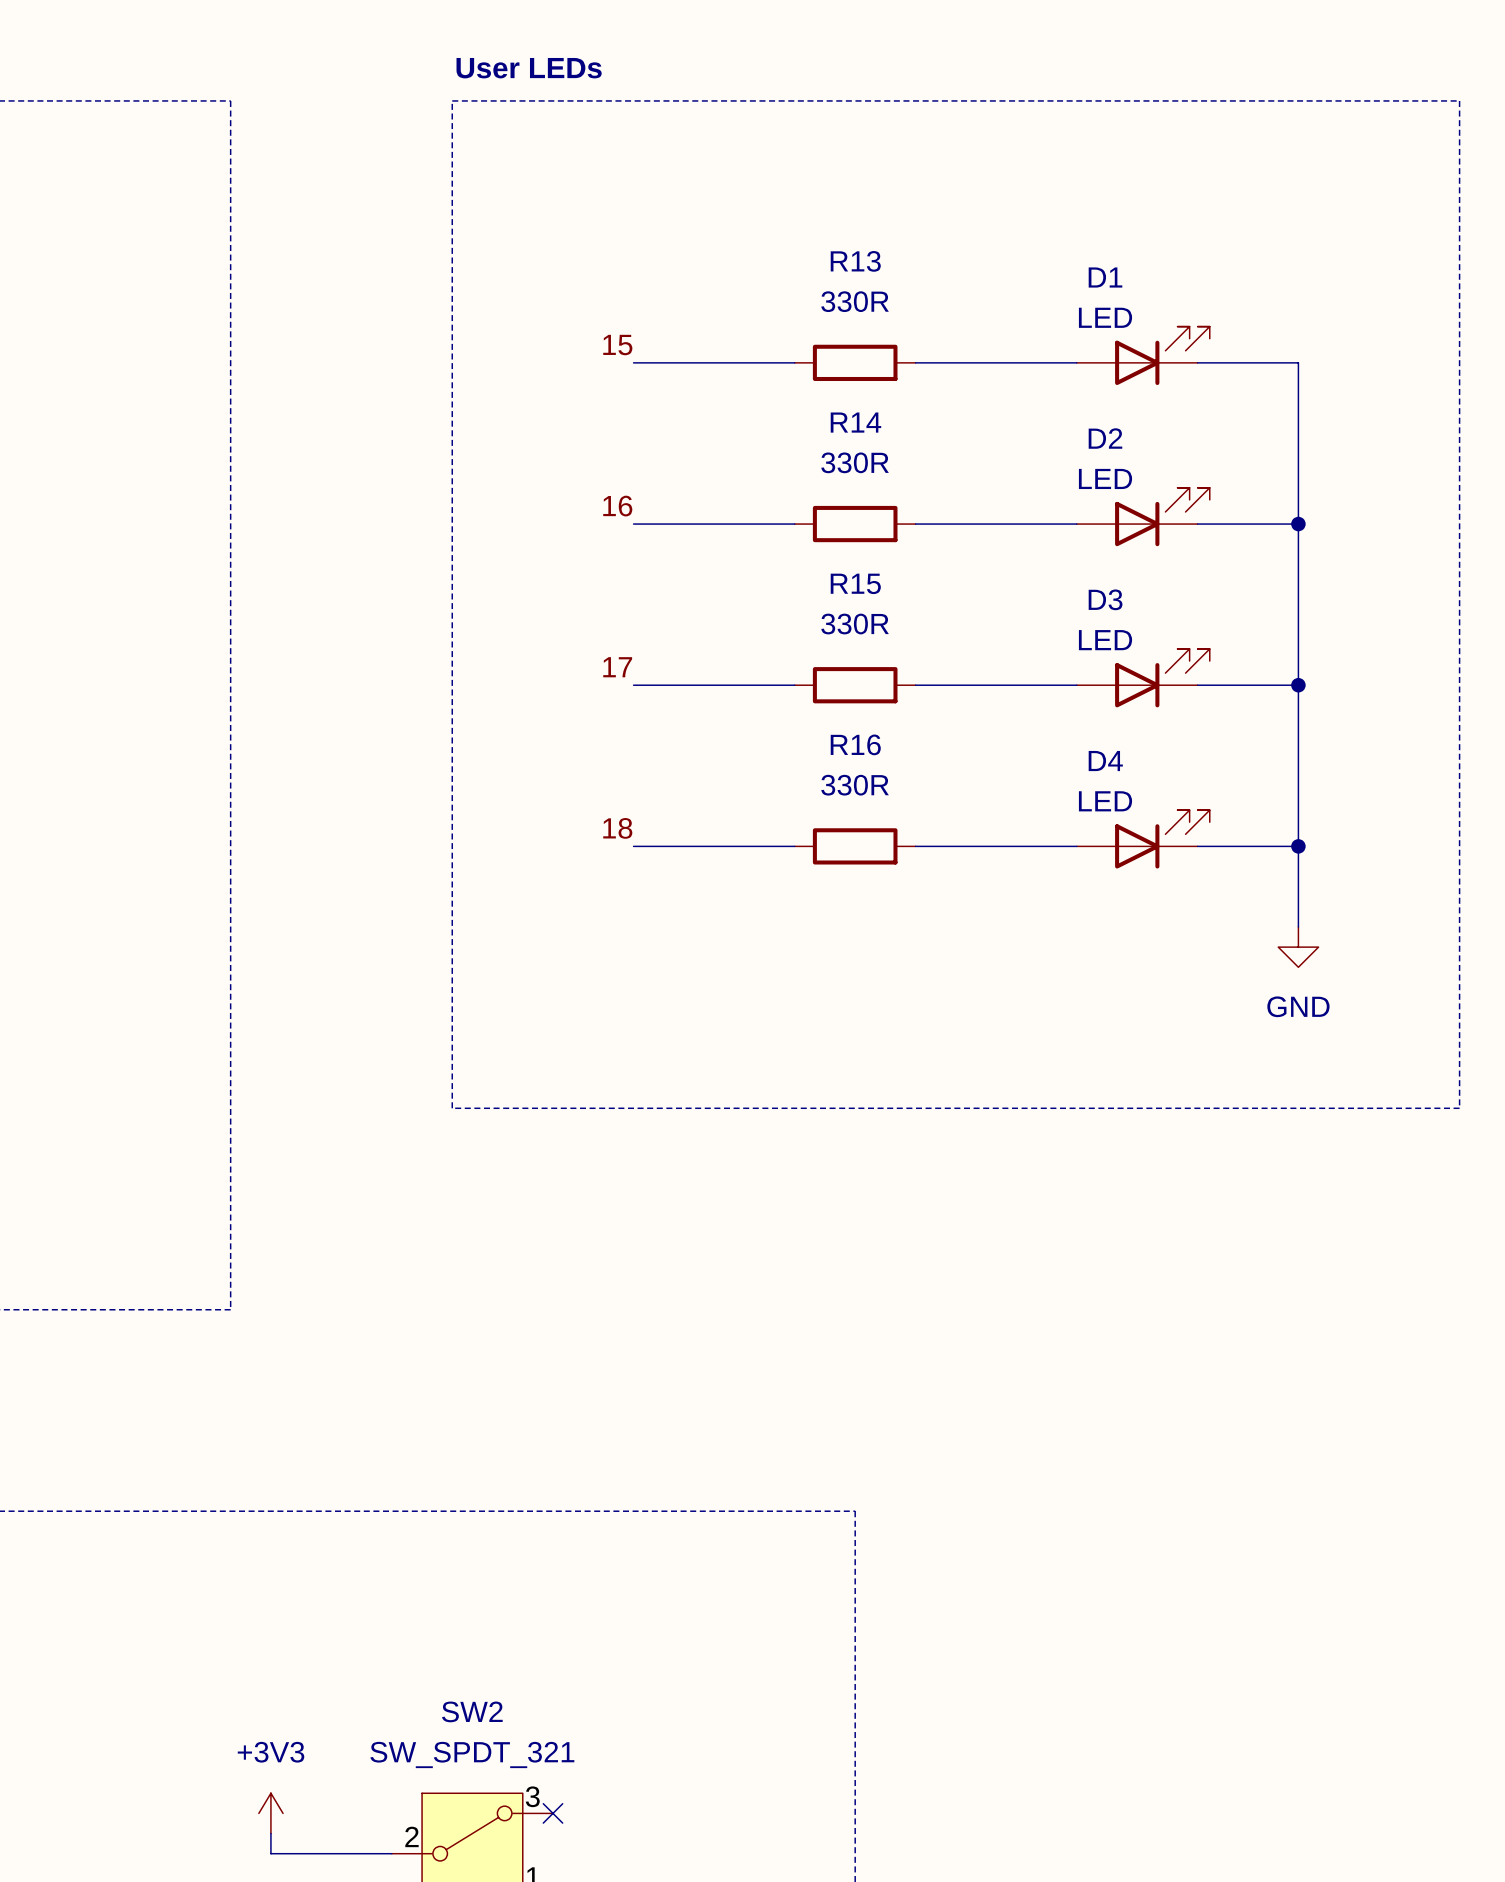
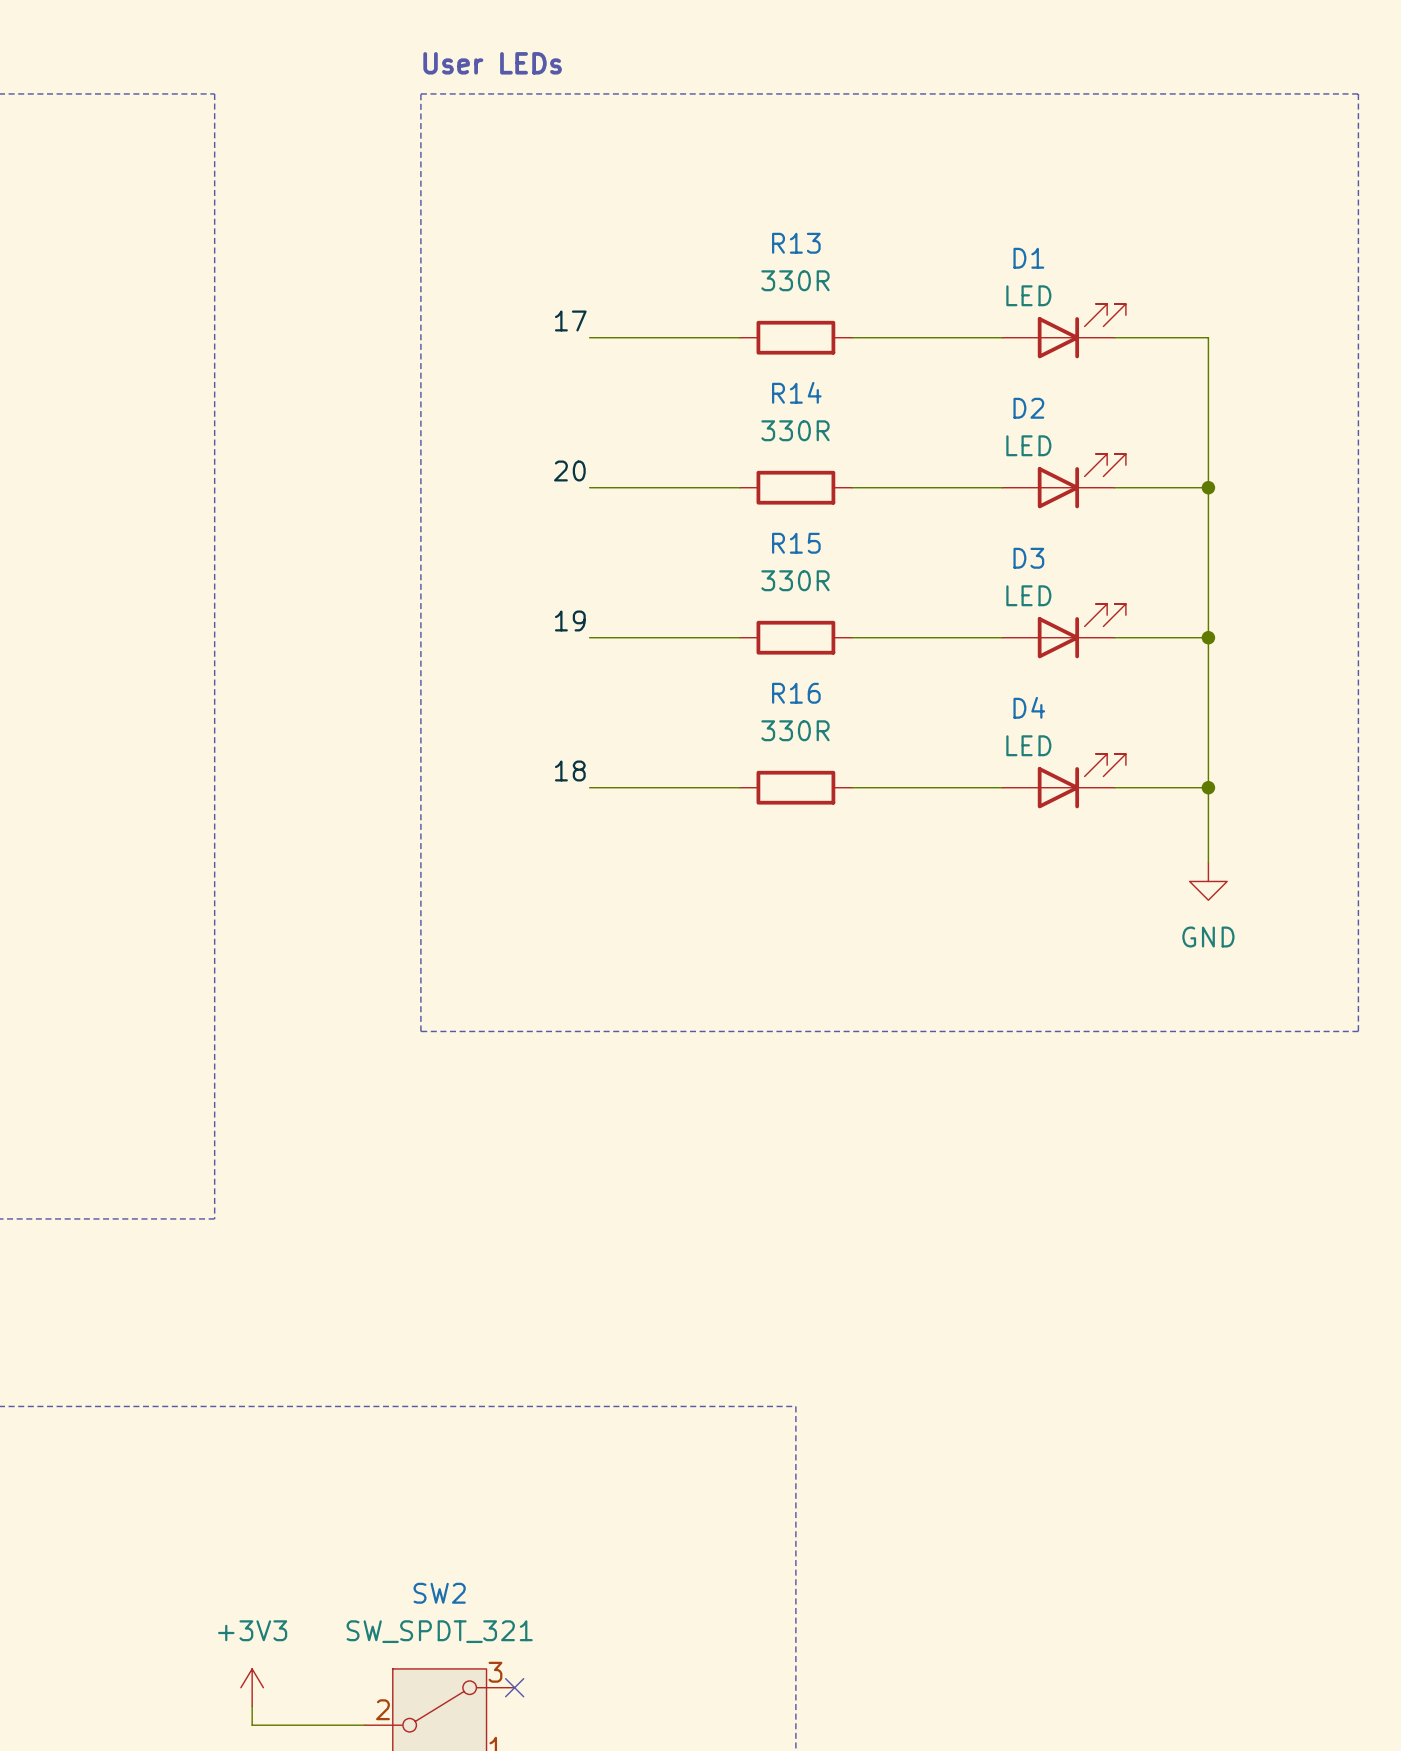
label: 15 (617, 345) -> 17 (570, 320)
label: 16 (617, 506) -> 20 (569, 470)
label: 17 (617, 667) -> 19 (570, 620)

